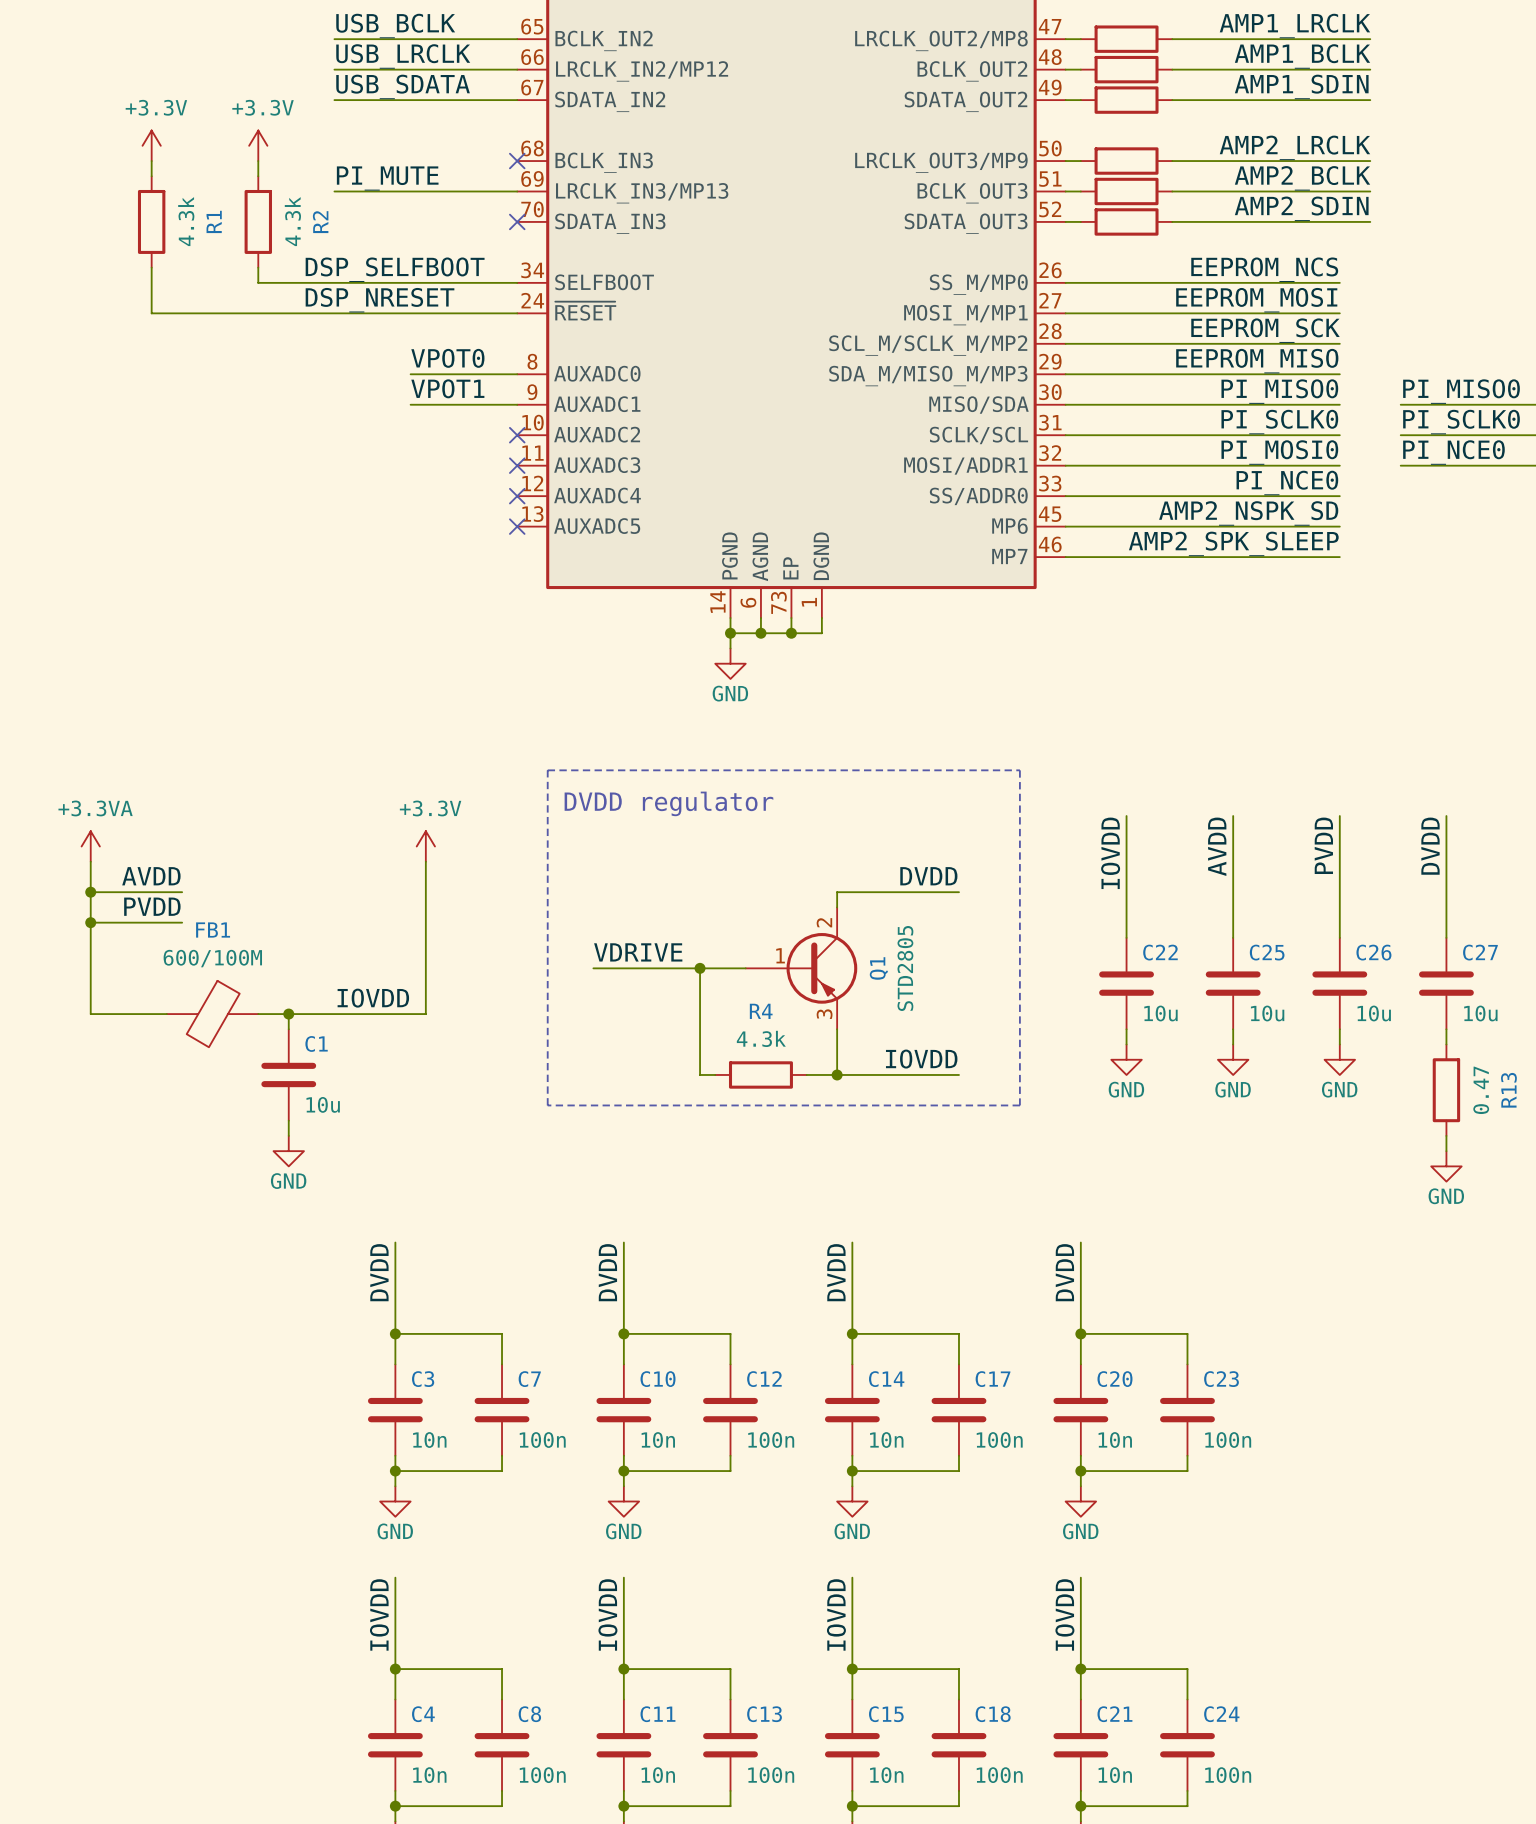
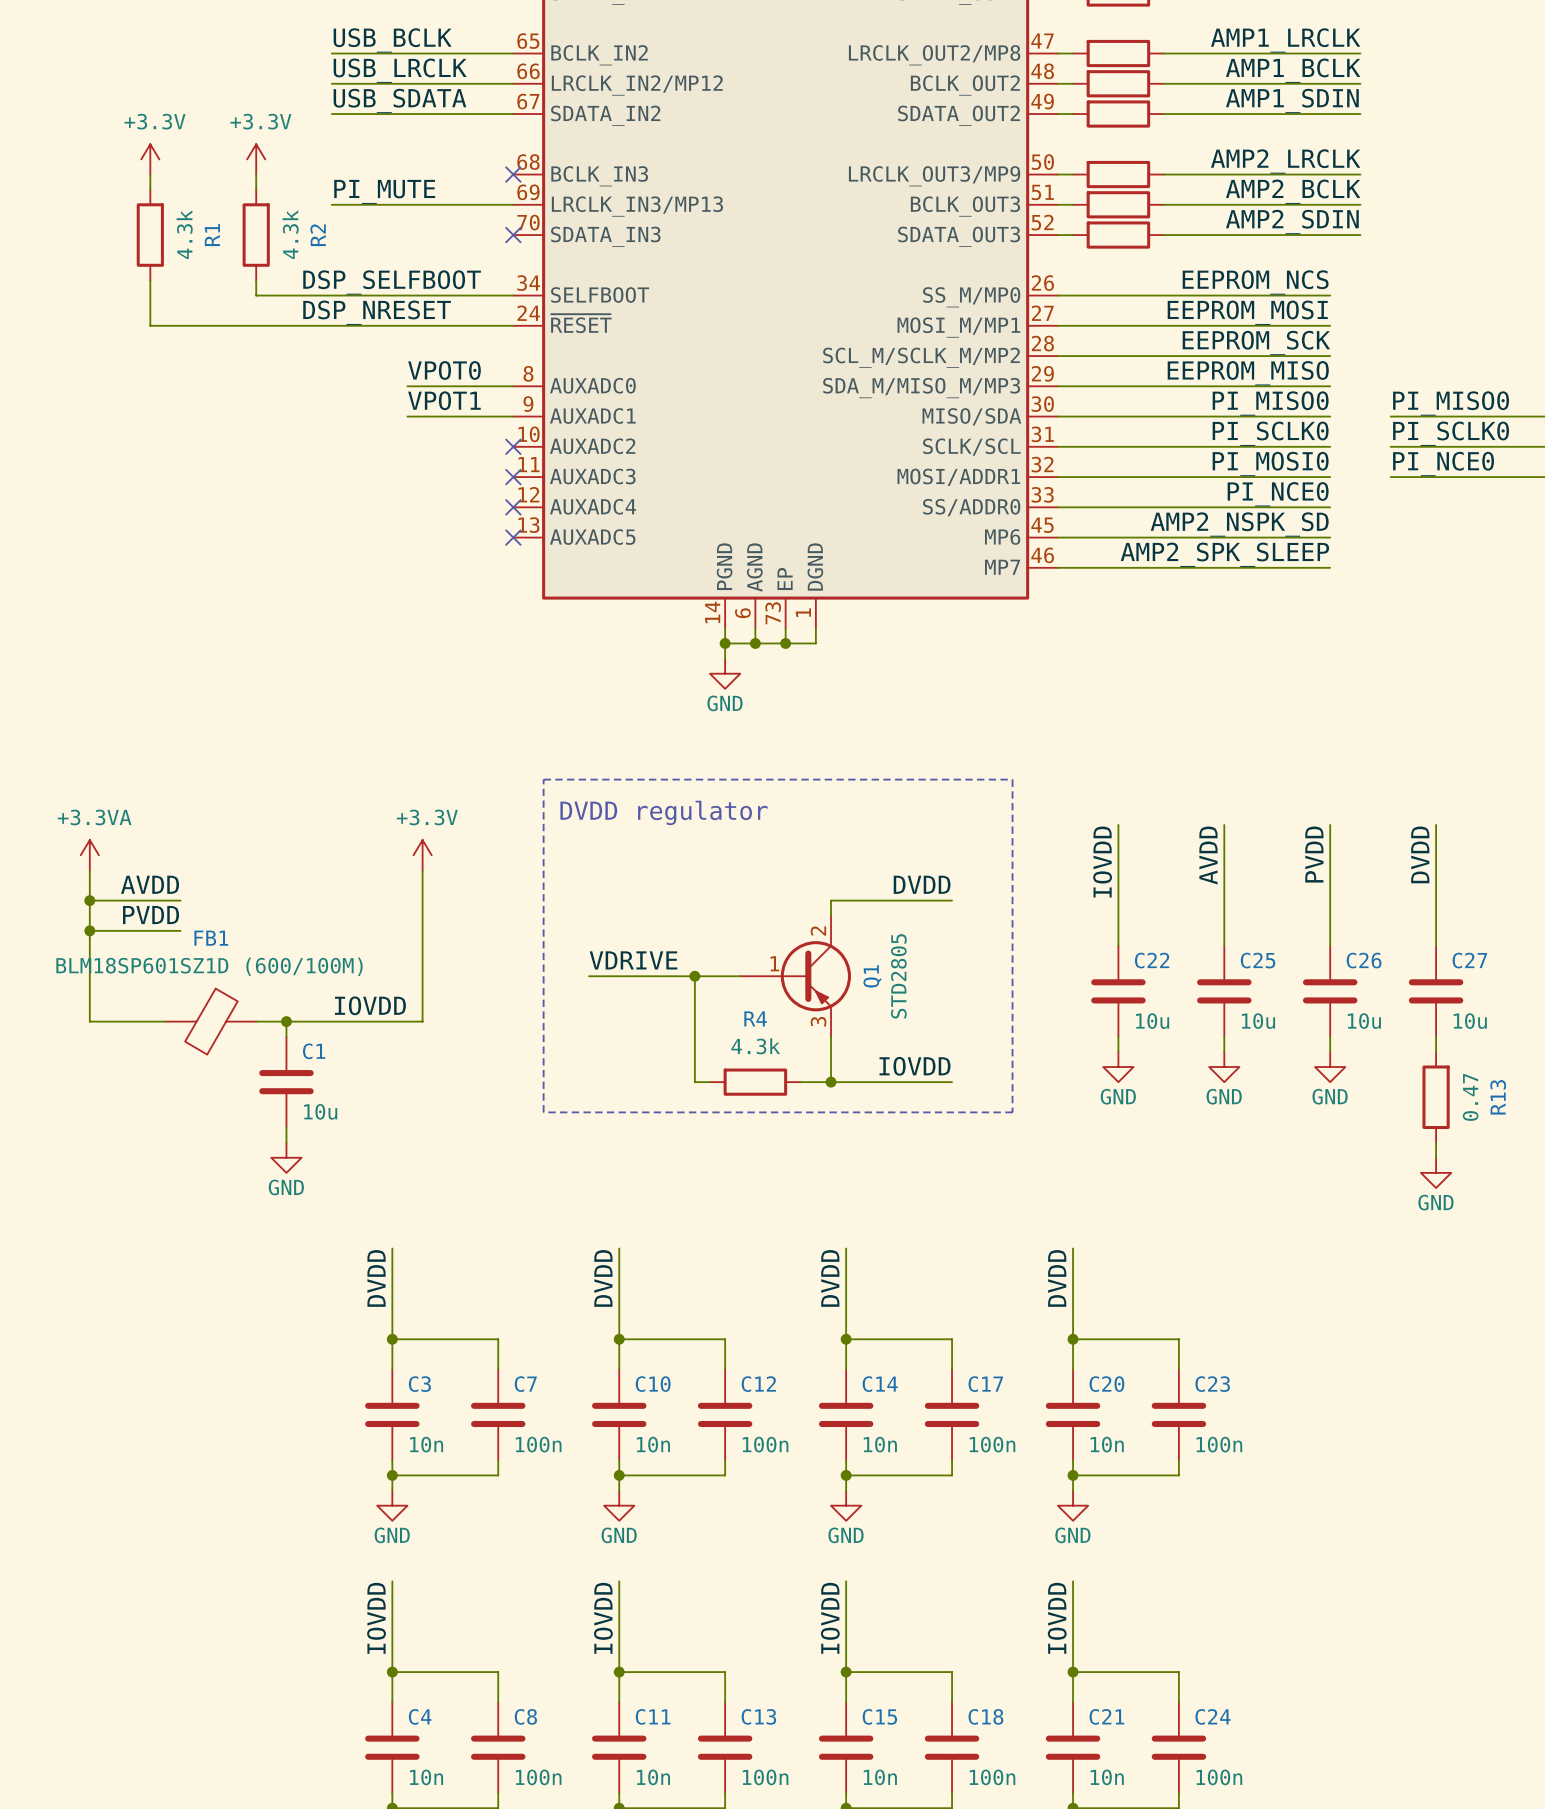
FB1 value: 600/100M (212, 958) -> BLM18SP601SZ1D (600/100M) (209, 966)

